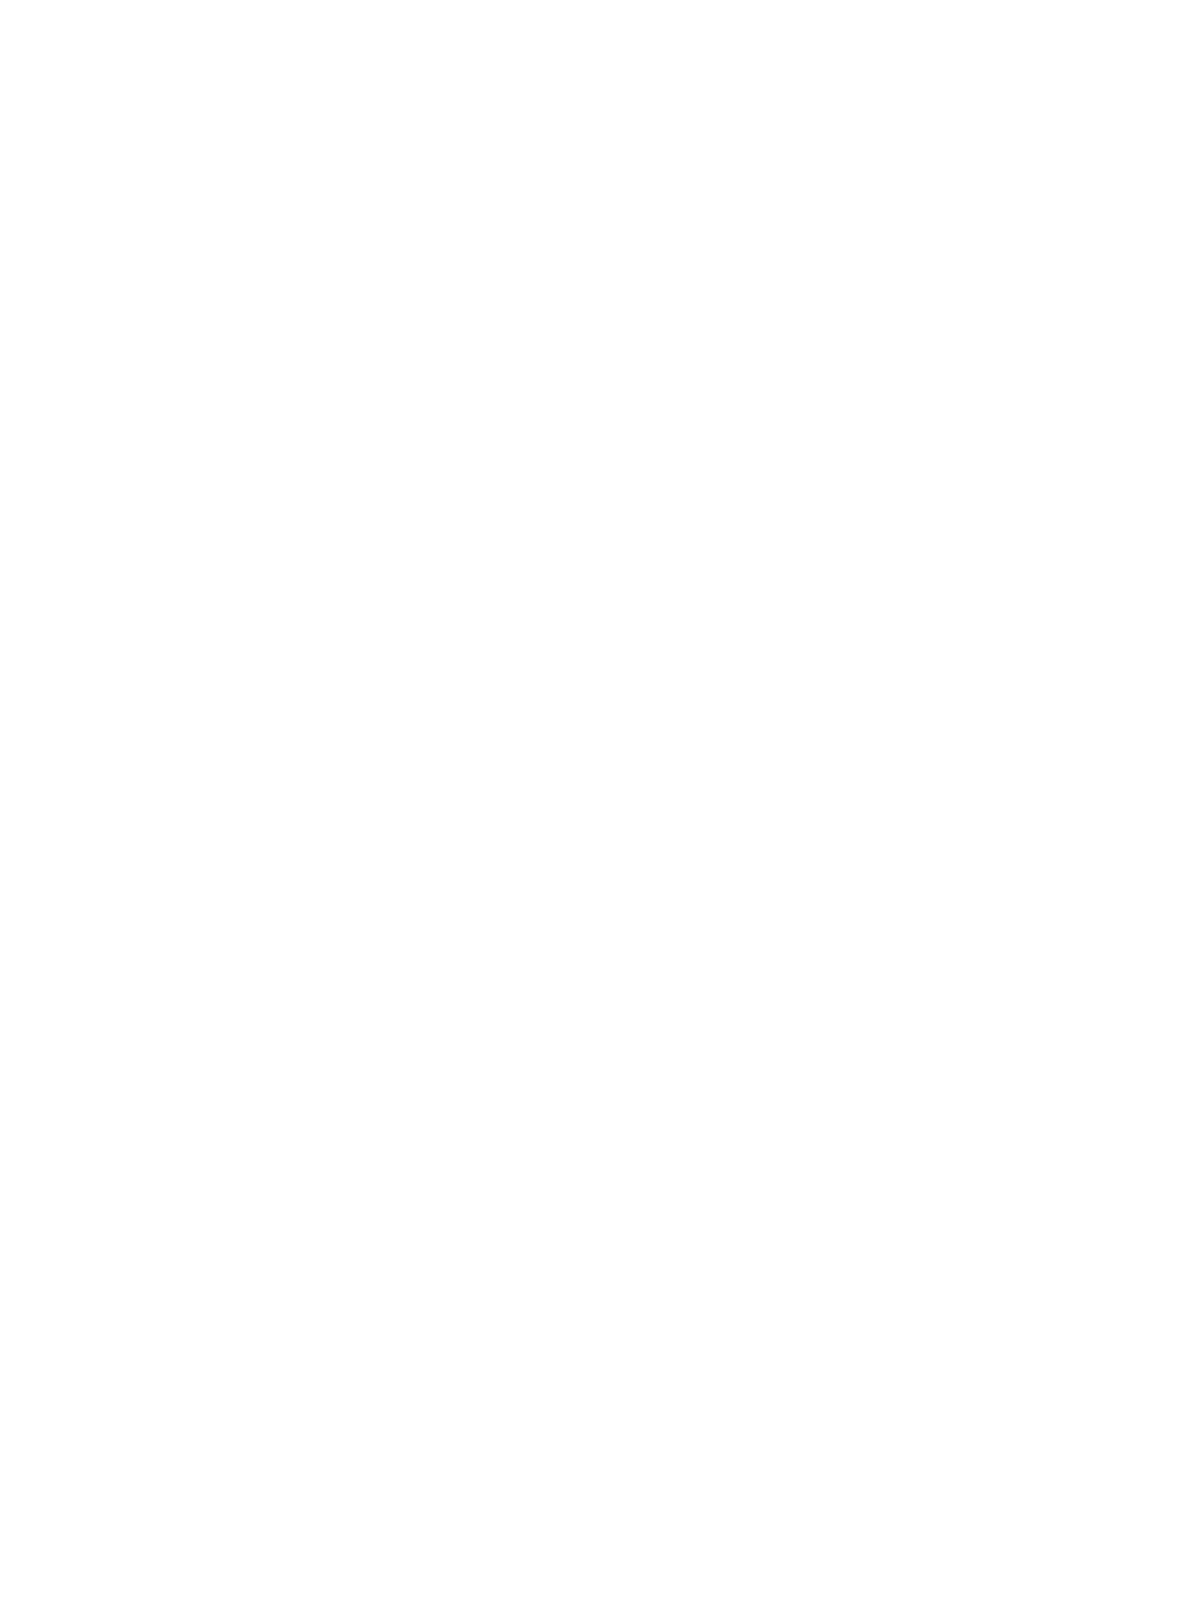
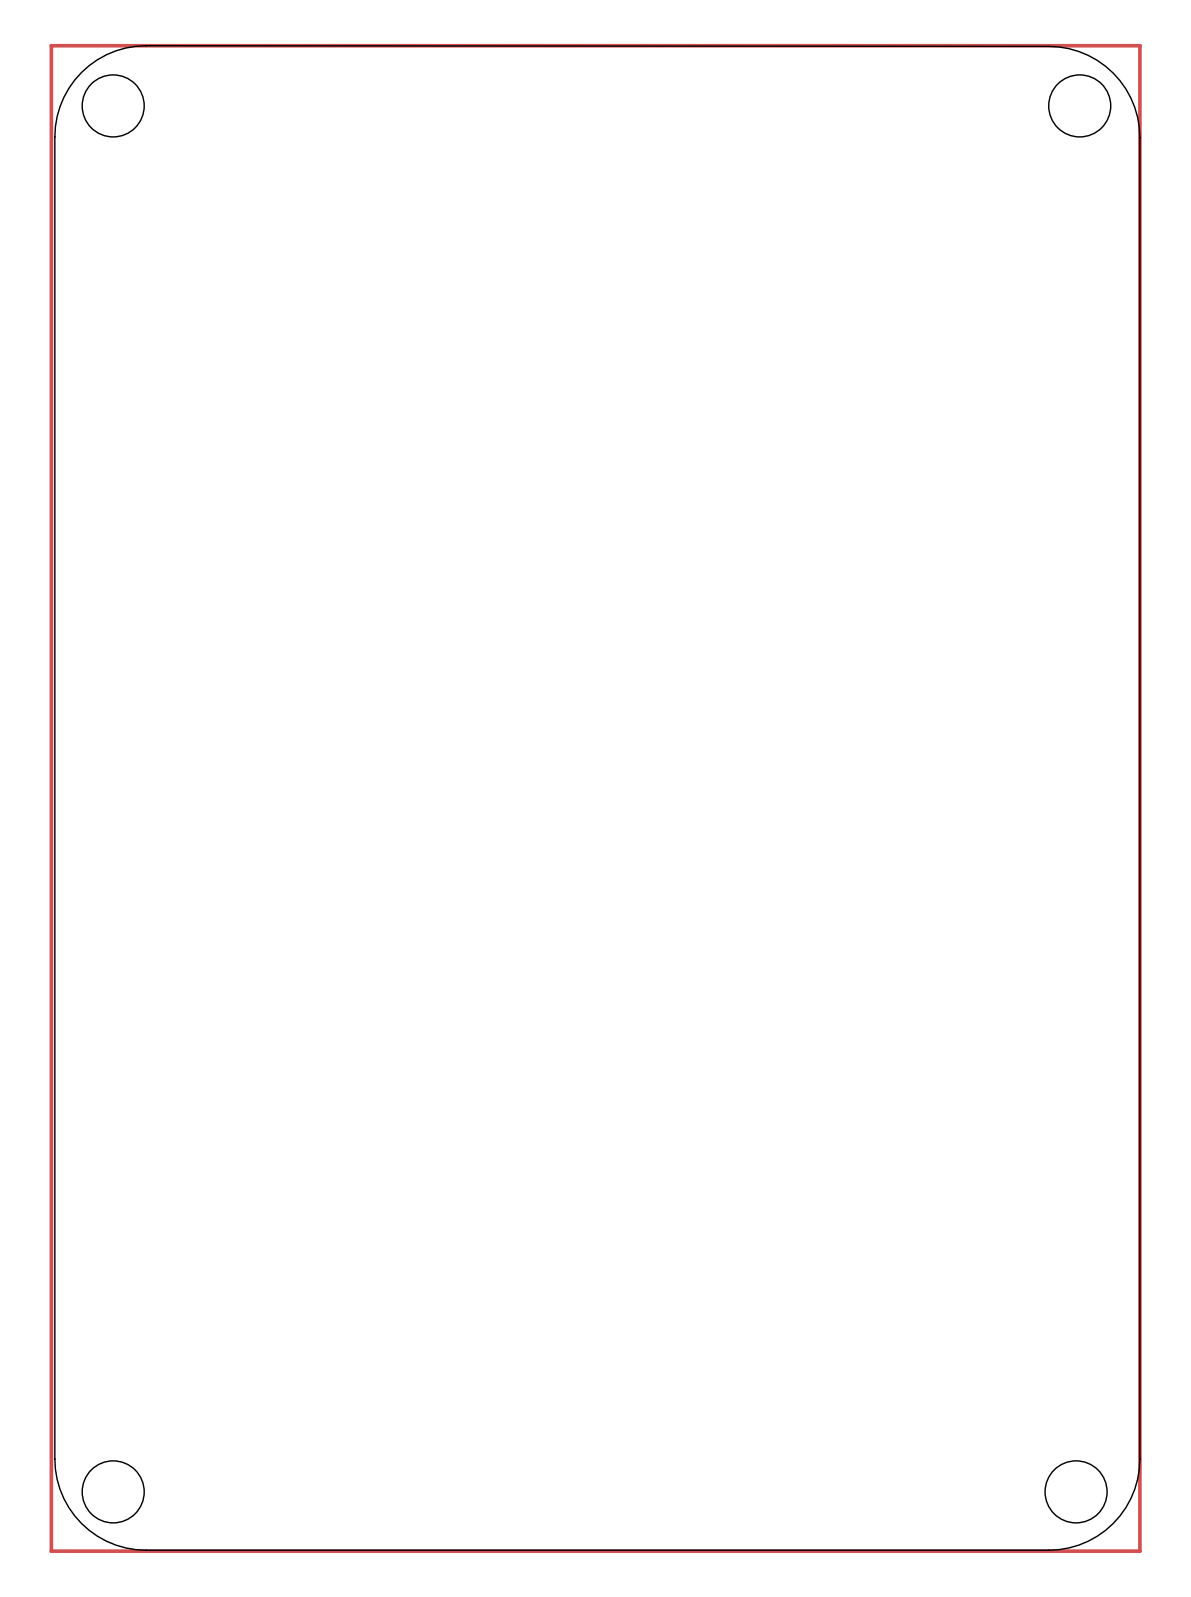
board edge: none -> (146, 45) (1048, 46) (1069, 48) (1088, 55) (1113, 73) (1125, 89) (1134, 107) (1139, 137) (1139, 1459) (1134, 1489) (1125, 1507) (1113, 1523) (1097, 1536) (1069, 1547) (1048, 1550) (146, 1550) (125, 1547) (106, 1541) (81, 1523) (68, 1507) (59, 1489) (54, 1459) (54, 136) (57, 116) (63, 97) (81, 72) (97, 59) (115, 50) (146, 45)
top track: none -> (1139, 45) (51, 45) (51, 1551) (1139, 1551) (1139, 45)
round board edge: none -> [81, 74, 145, 138]
round board edge: none -> [1048, 74, 1112, 138]
round board edge: none -> [81, 1460, 145, 1524]
round board edge: none -> [1044, 1460, 1108, 1524]

